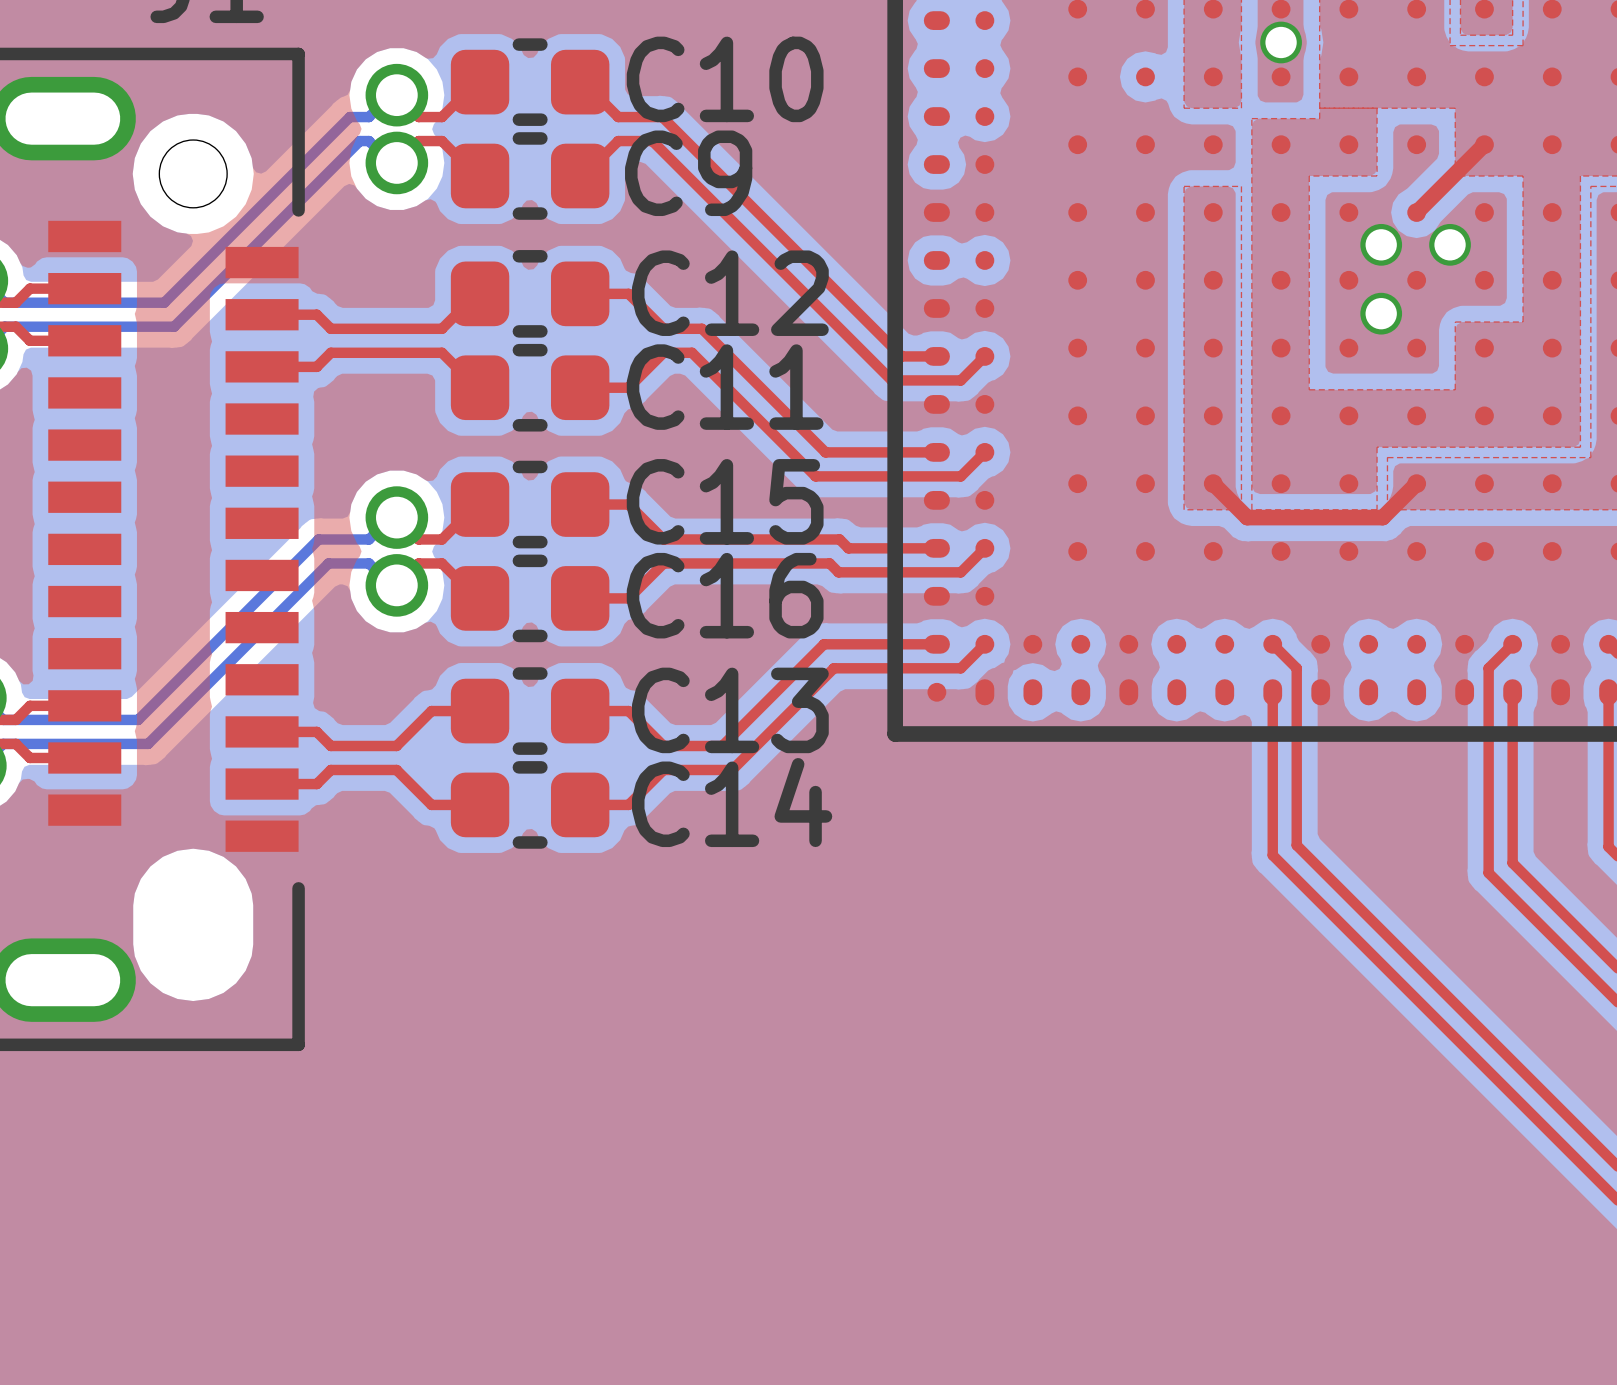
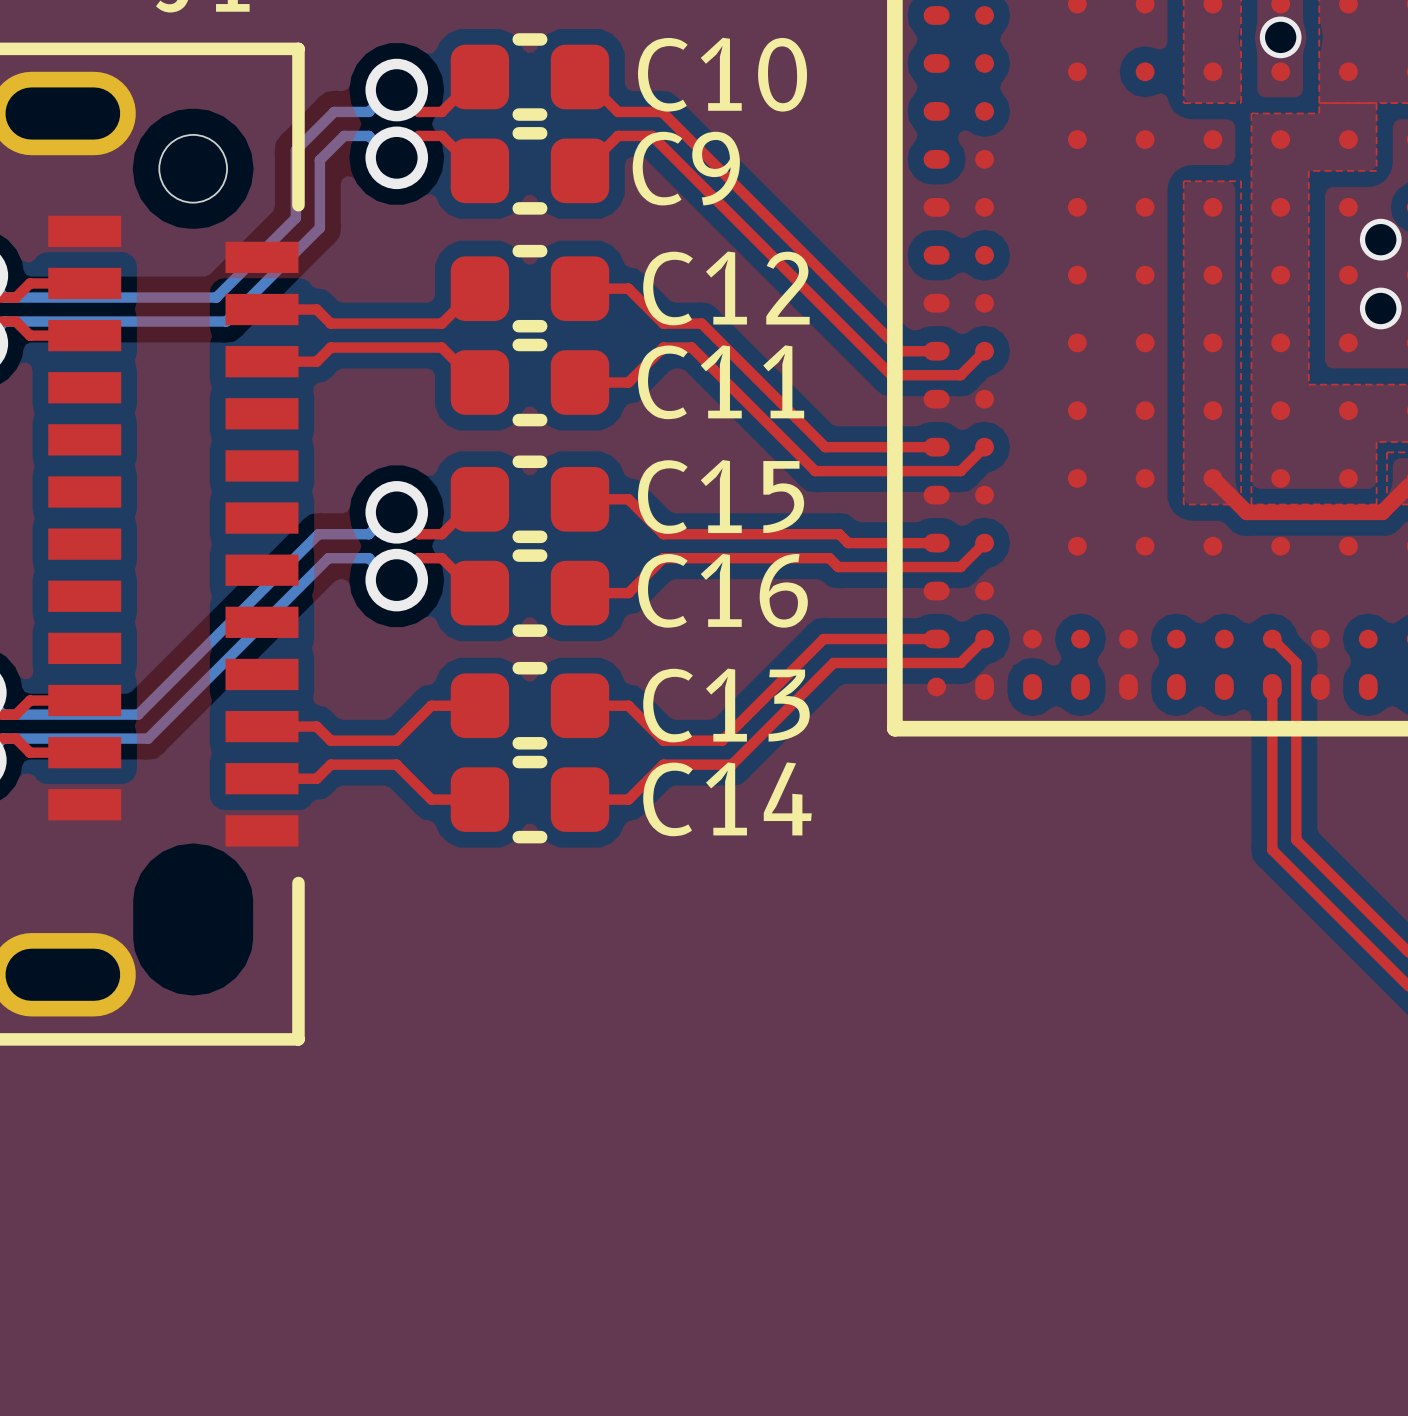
bottom track: (349, 117) (164, 302) -> (349, 111) (334, 111) (295, 150) (295, 218) (216, 297) (164, 297)
bottom track: (359, 141) (174, 326) -> (359, 135) (344, 135) (319, 160) (319, 227) (226, 321) (174, 321)

